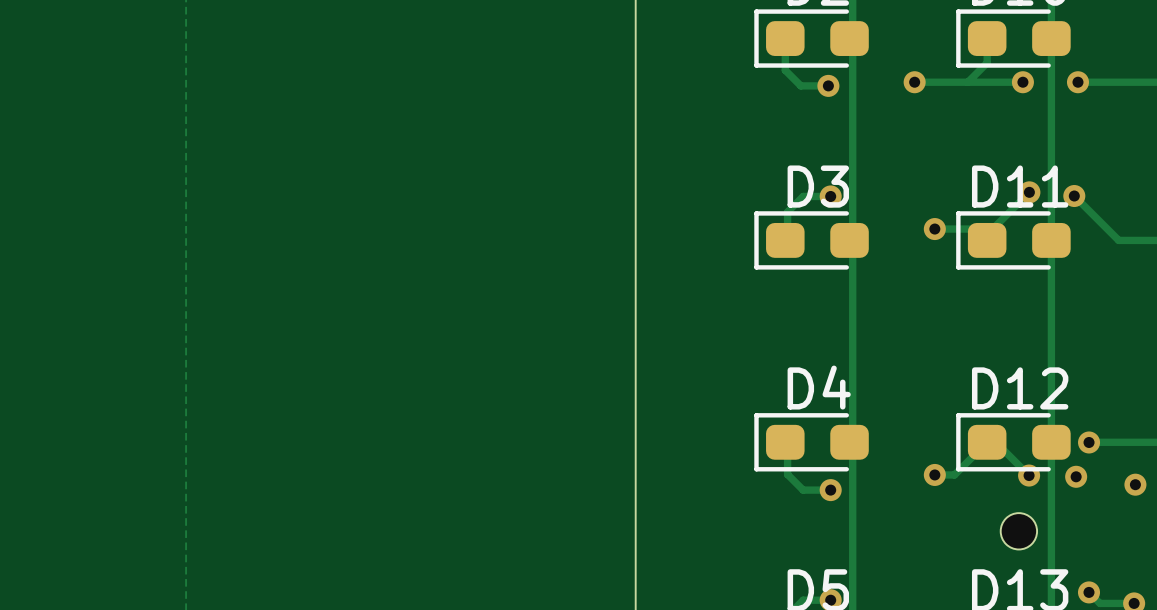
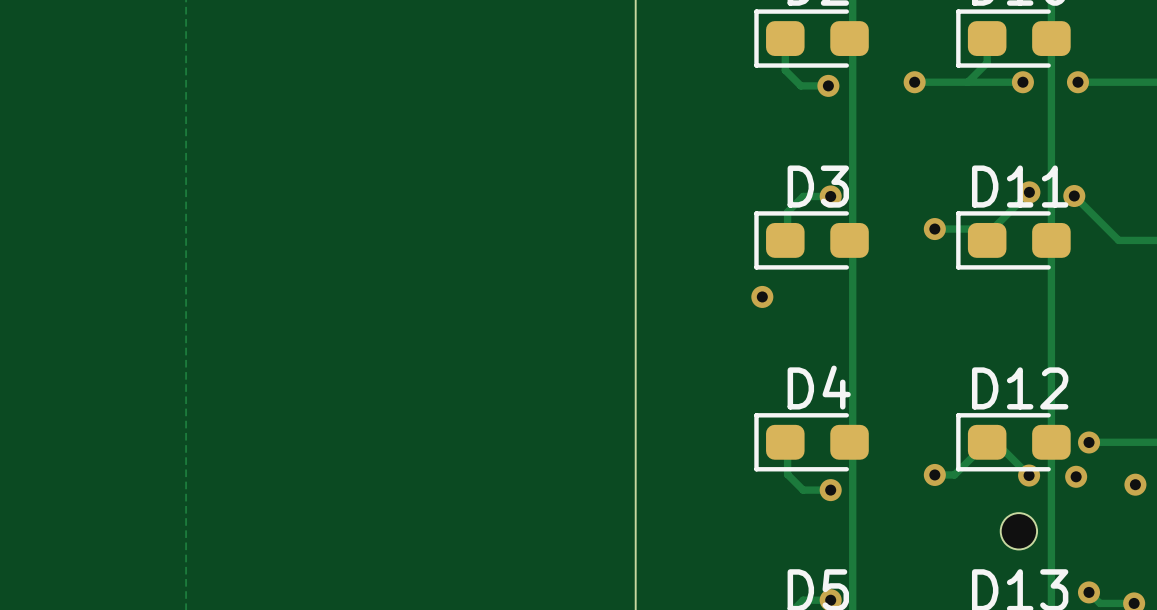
via: none -> (762, 296)

